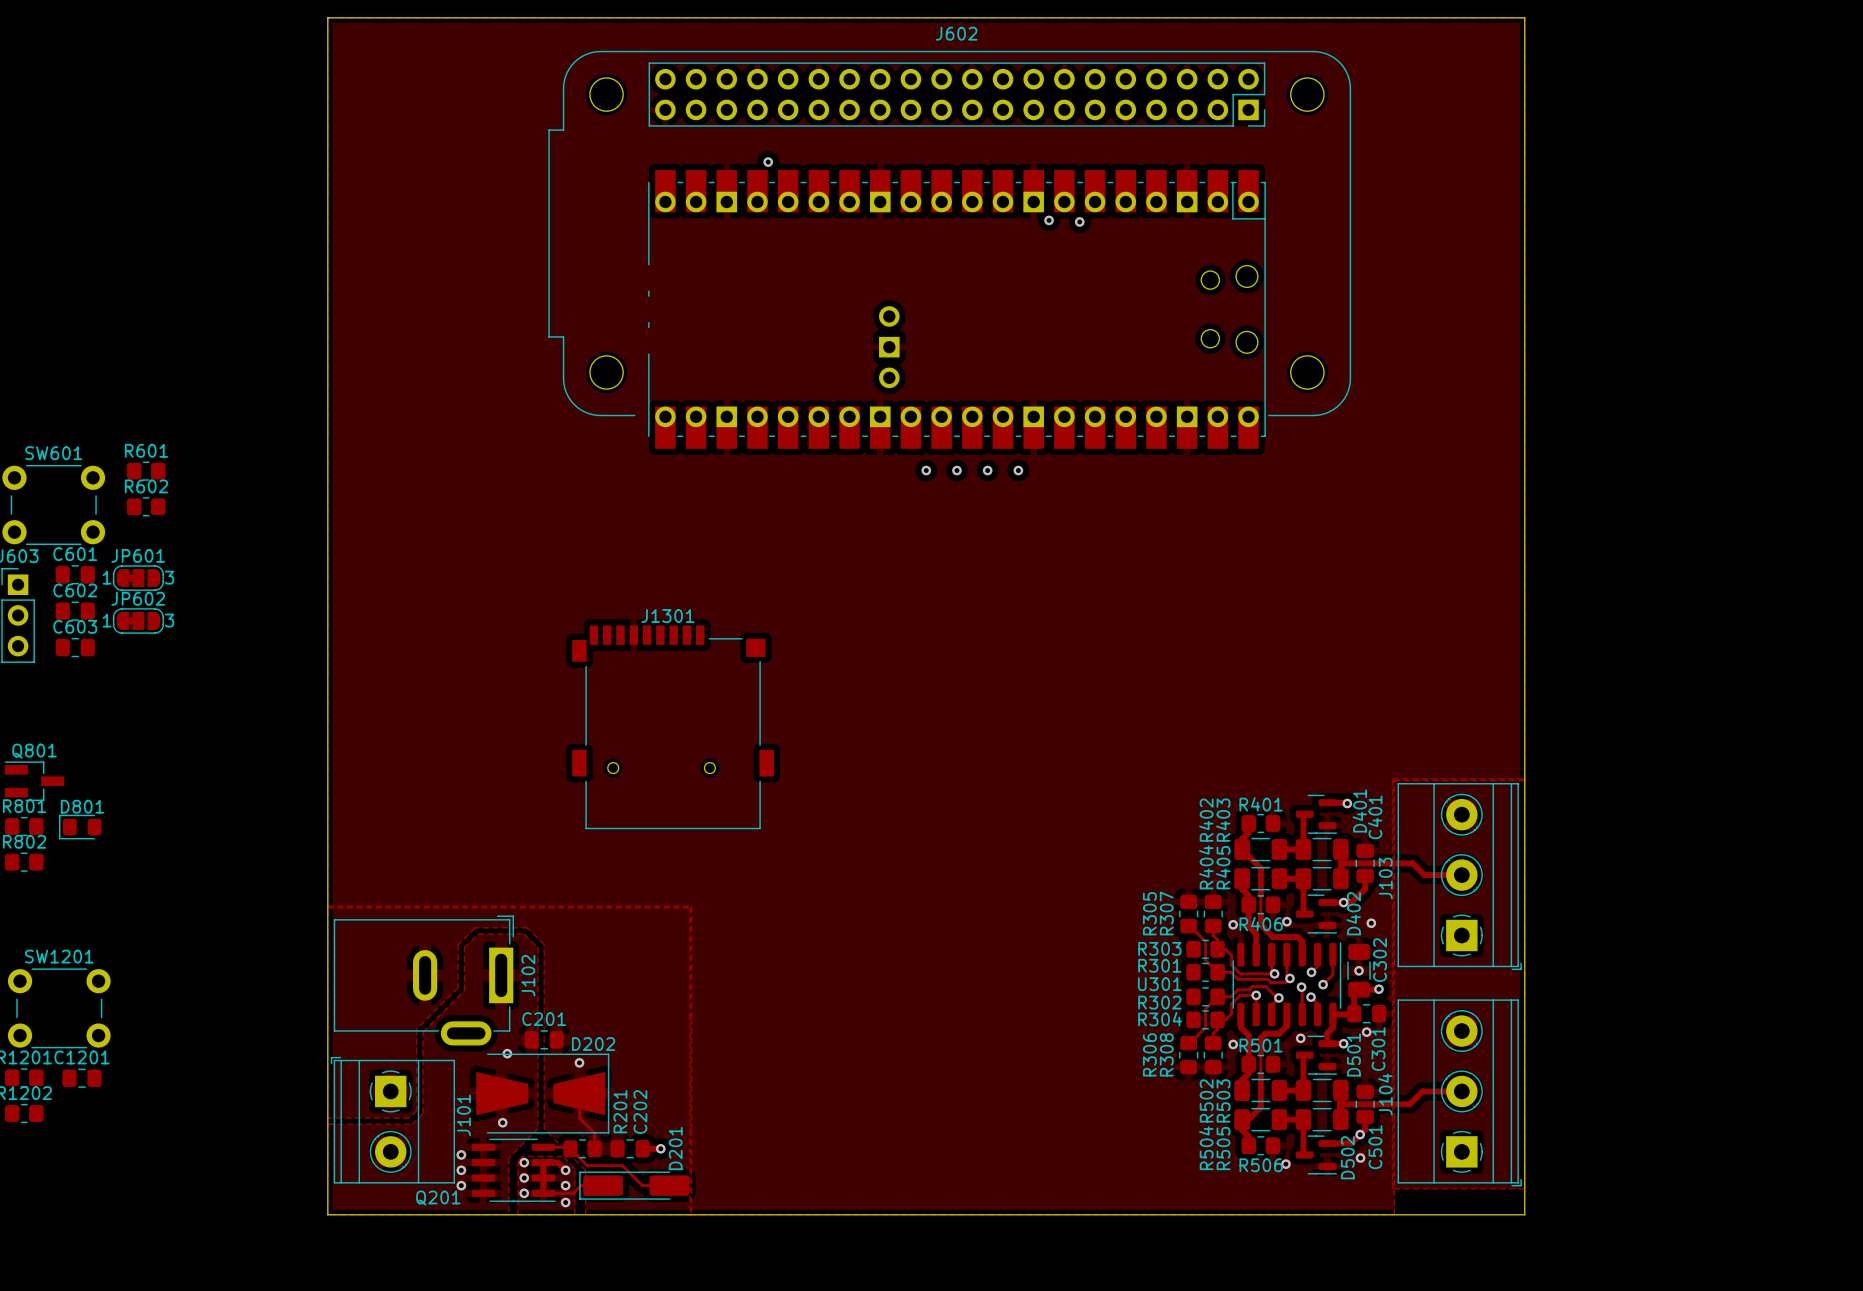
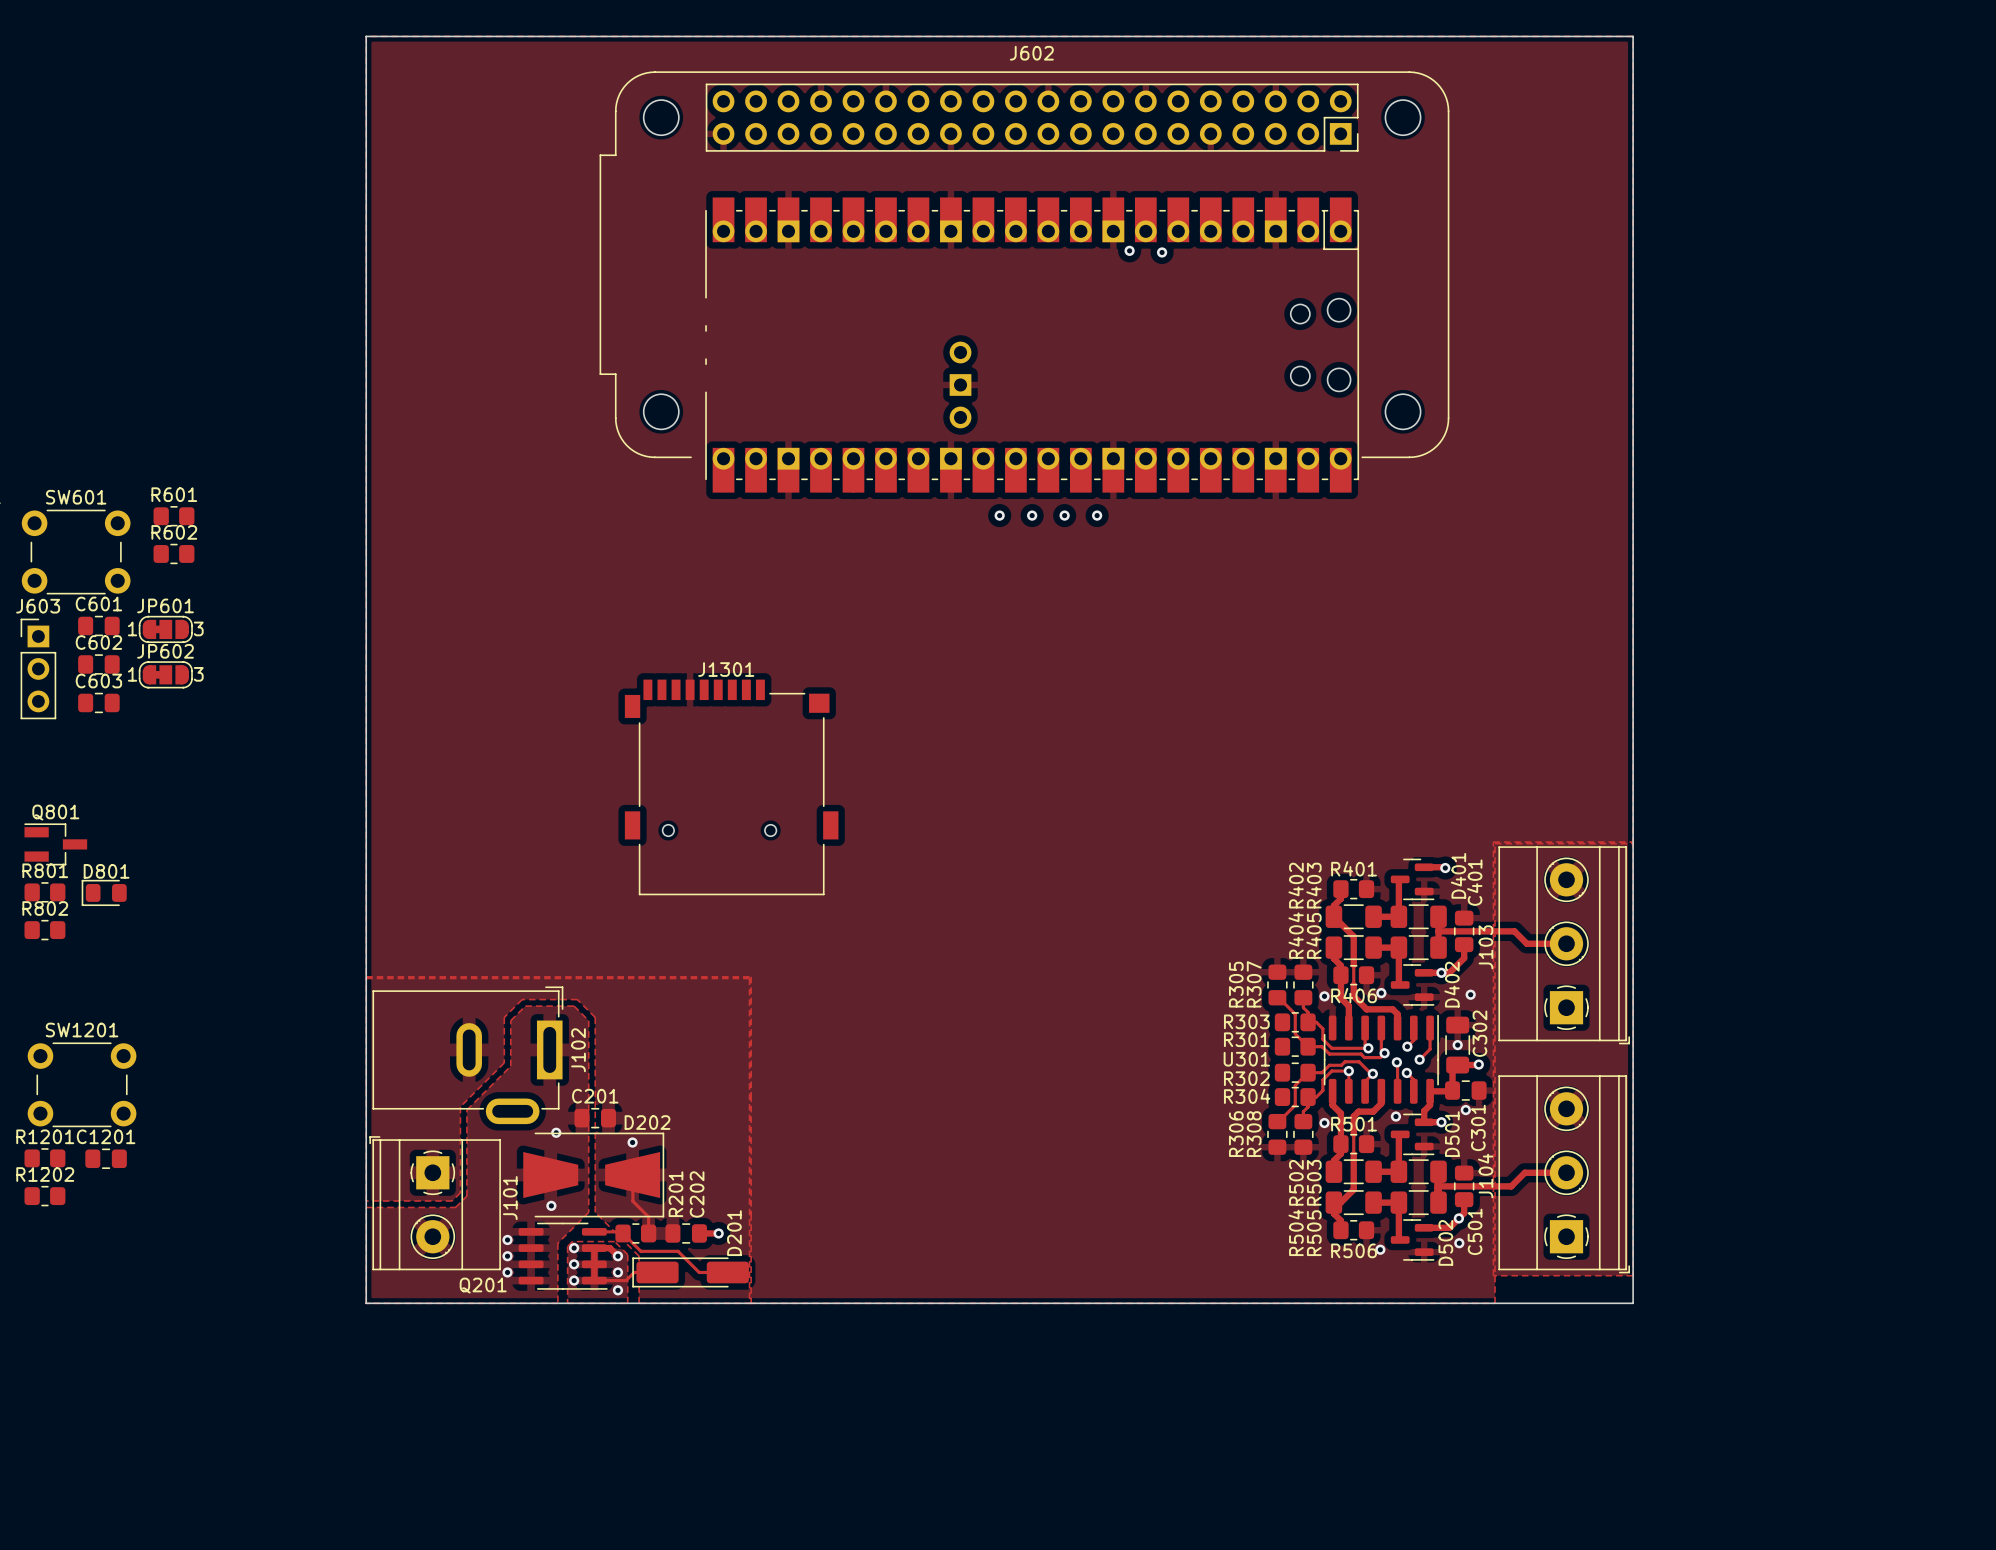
via: (768, 162) -> none

